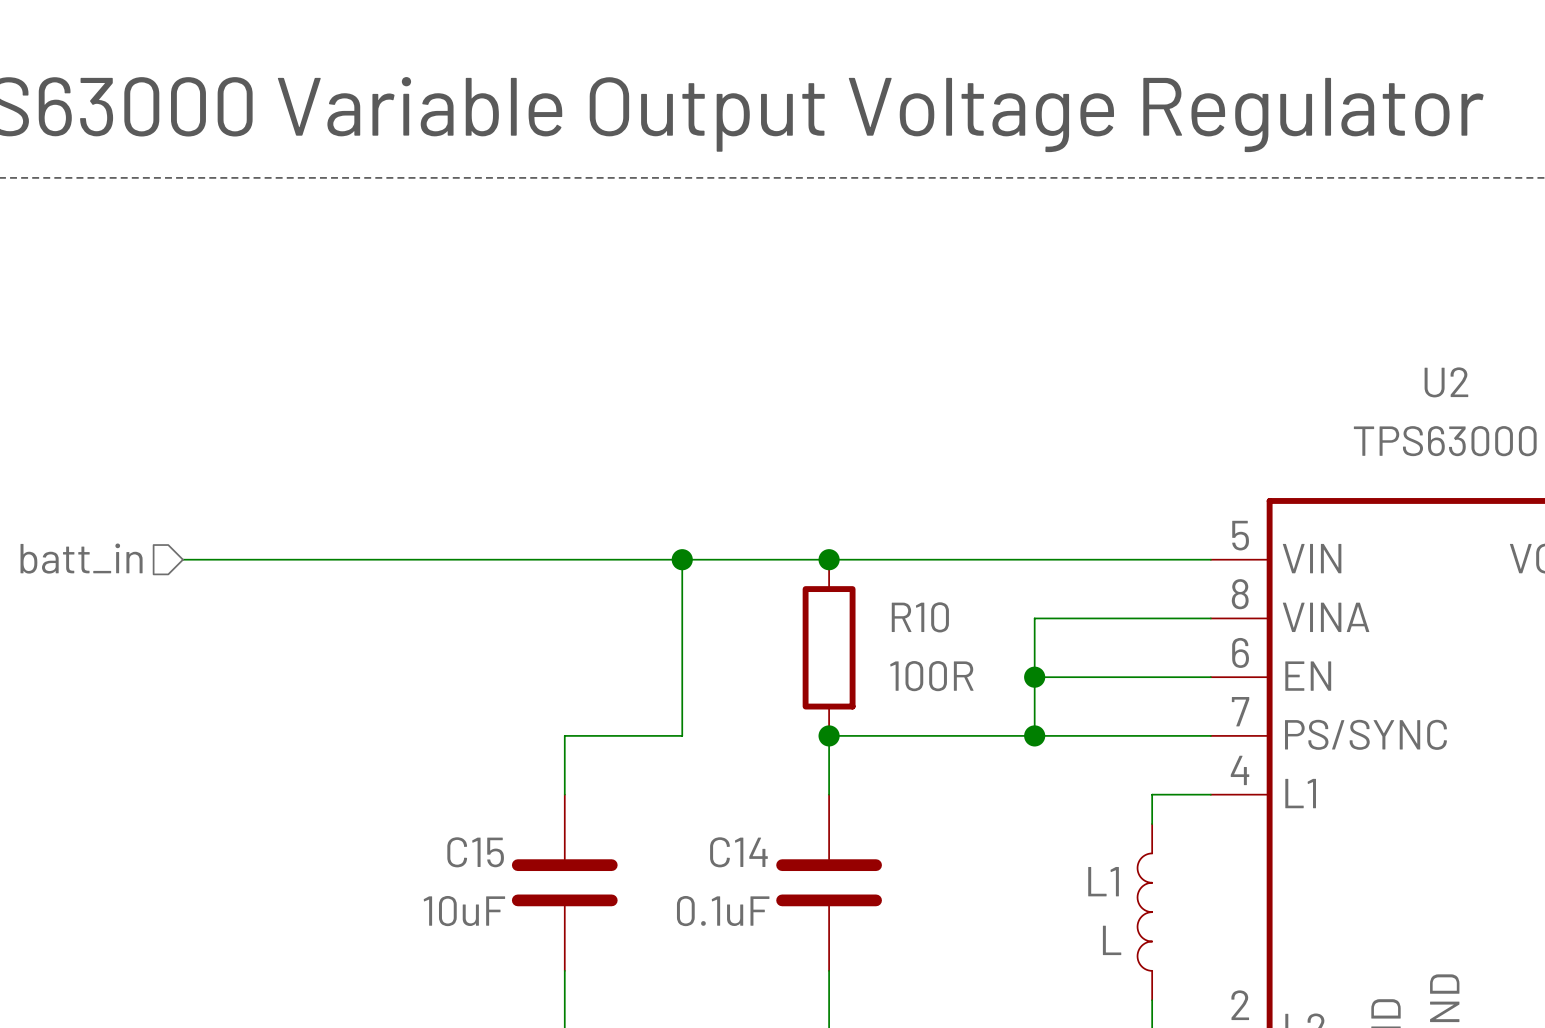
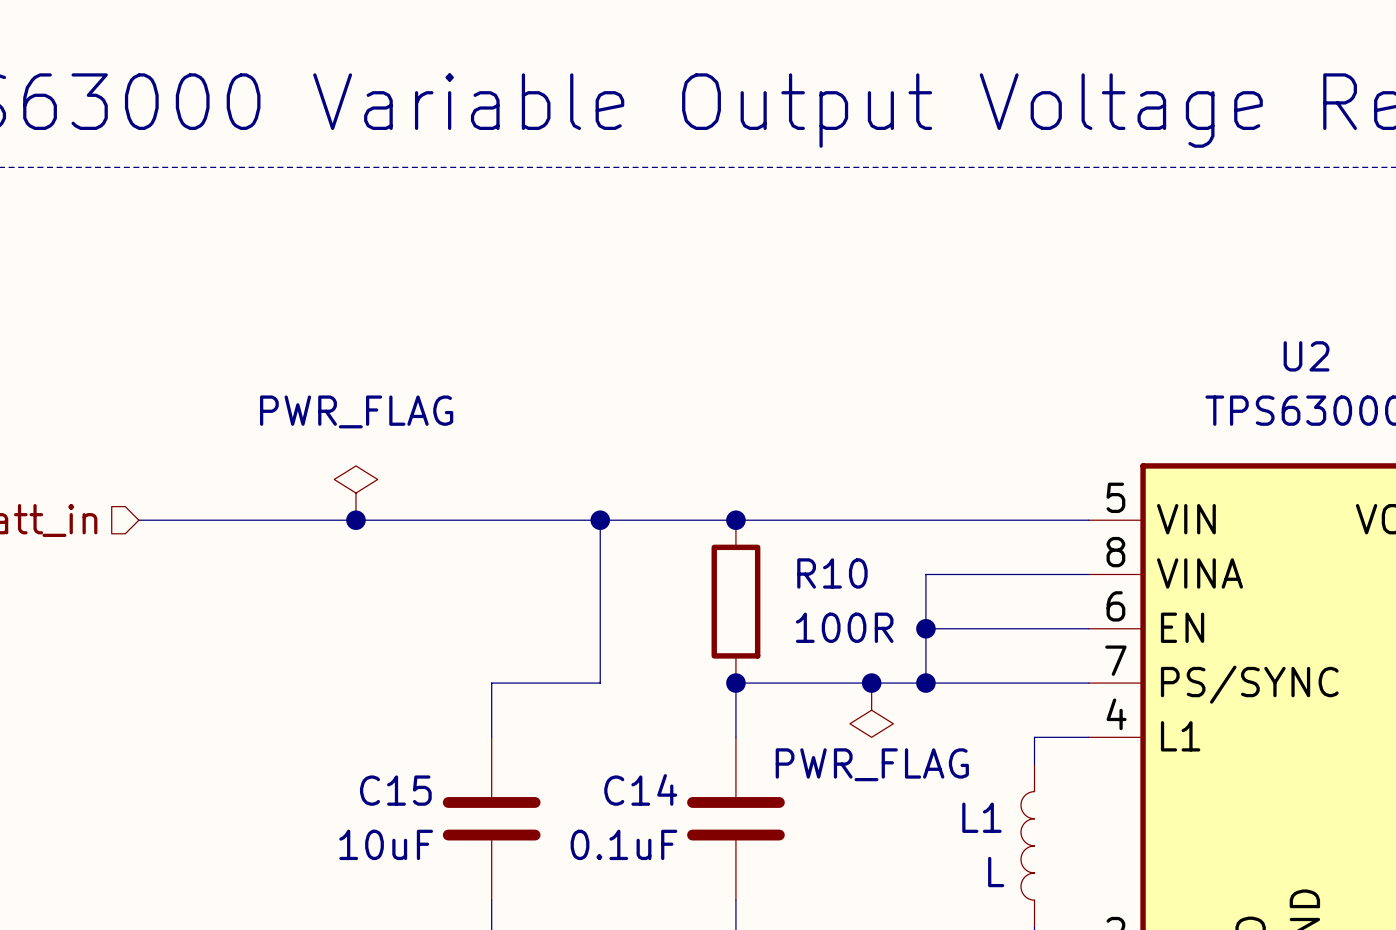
power symbol: none -> PWR_FLAG (355, 493)
junction: none -> (355, 520)
junction: none -> (871, 683)
power symbol: none -> PWR_FLAG (871, 710)

